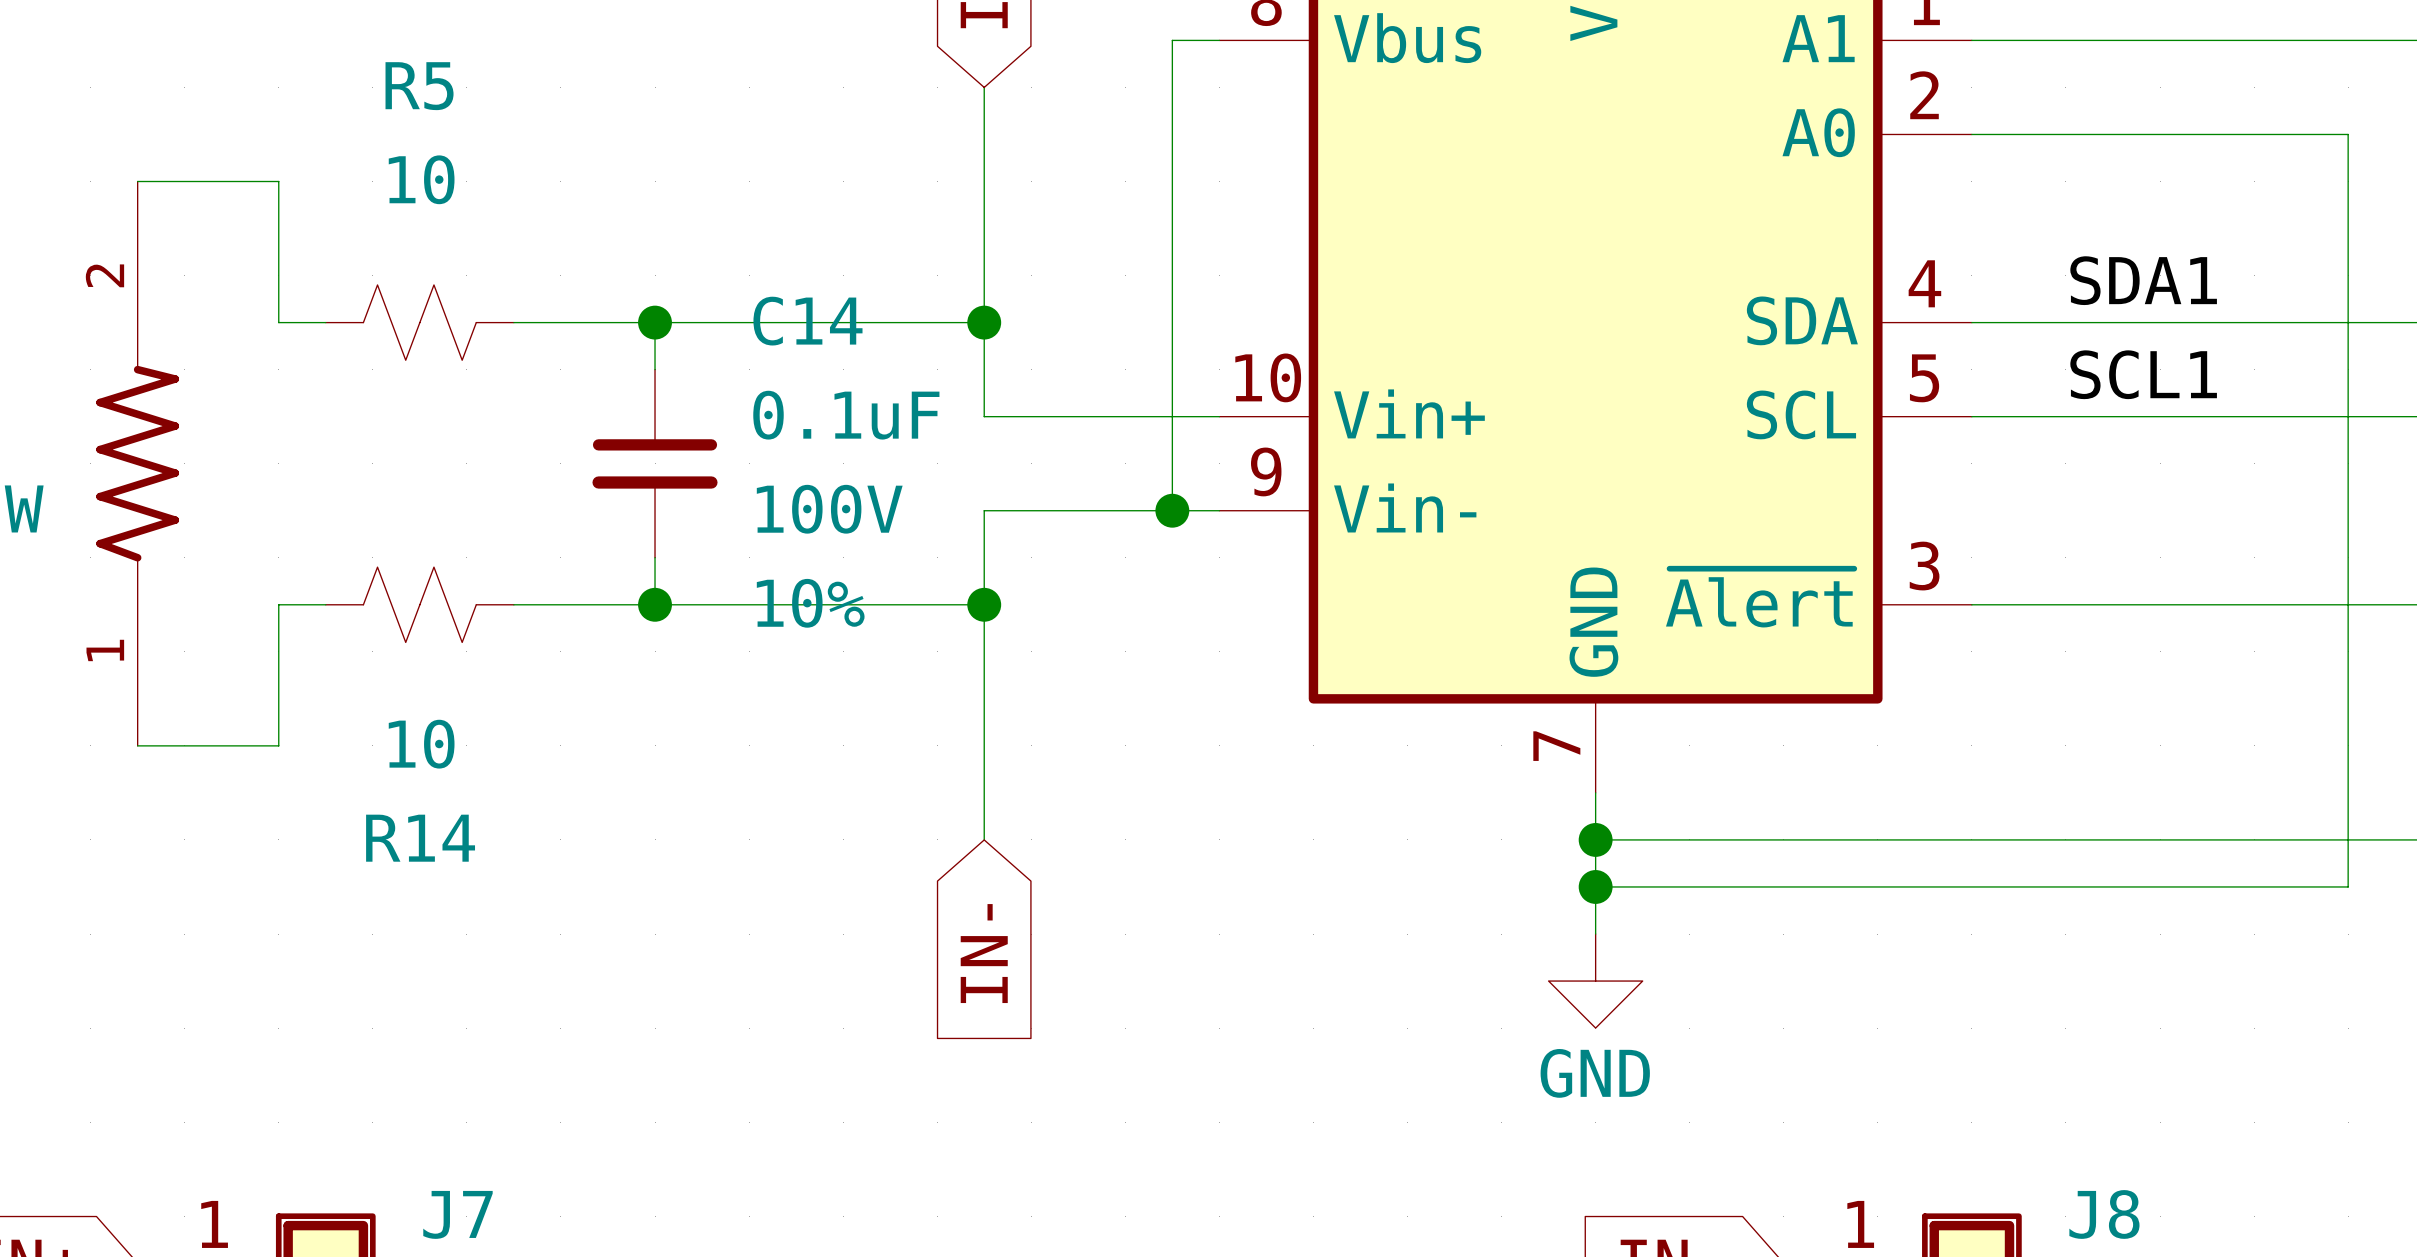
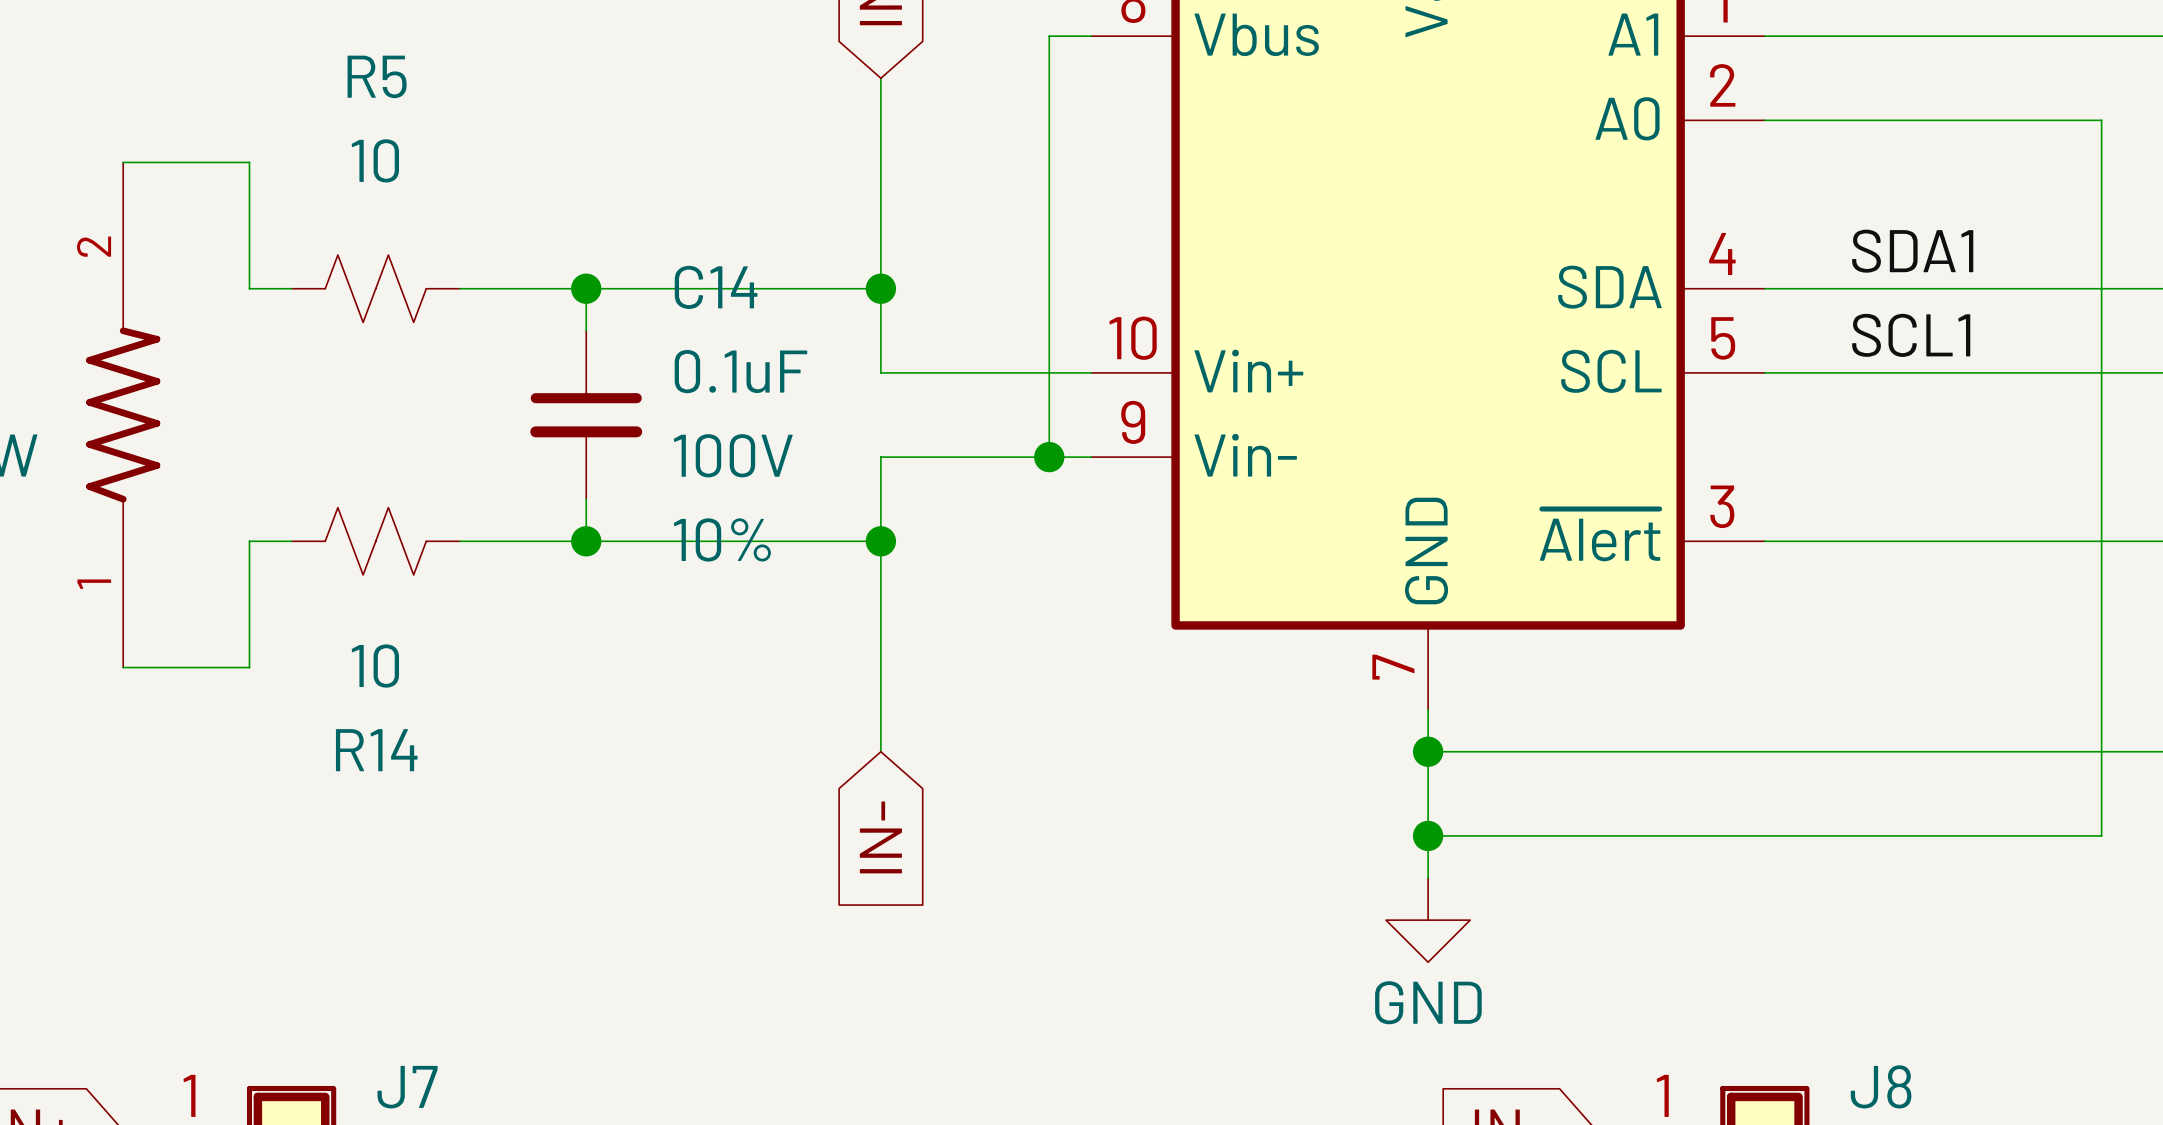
wire: (1595, 886) (2348, 886) -> (1428, 878) (1428, 835) (2101, 835) (2101, 793)
junction position: (1595, 886) -> (1428, 835)
power symbol position: GND (1595, 981) -> GND (1428, 920)

